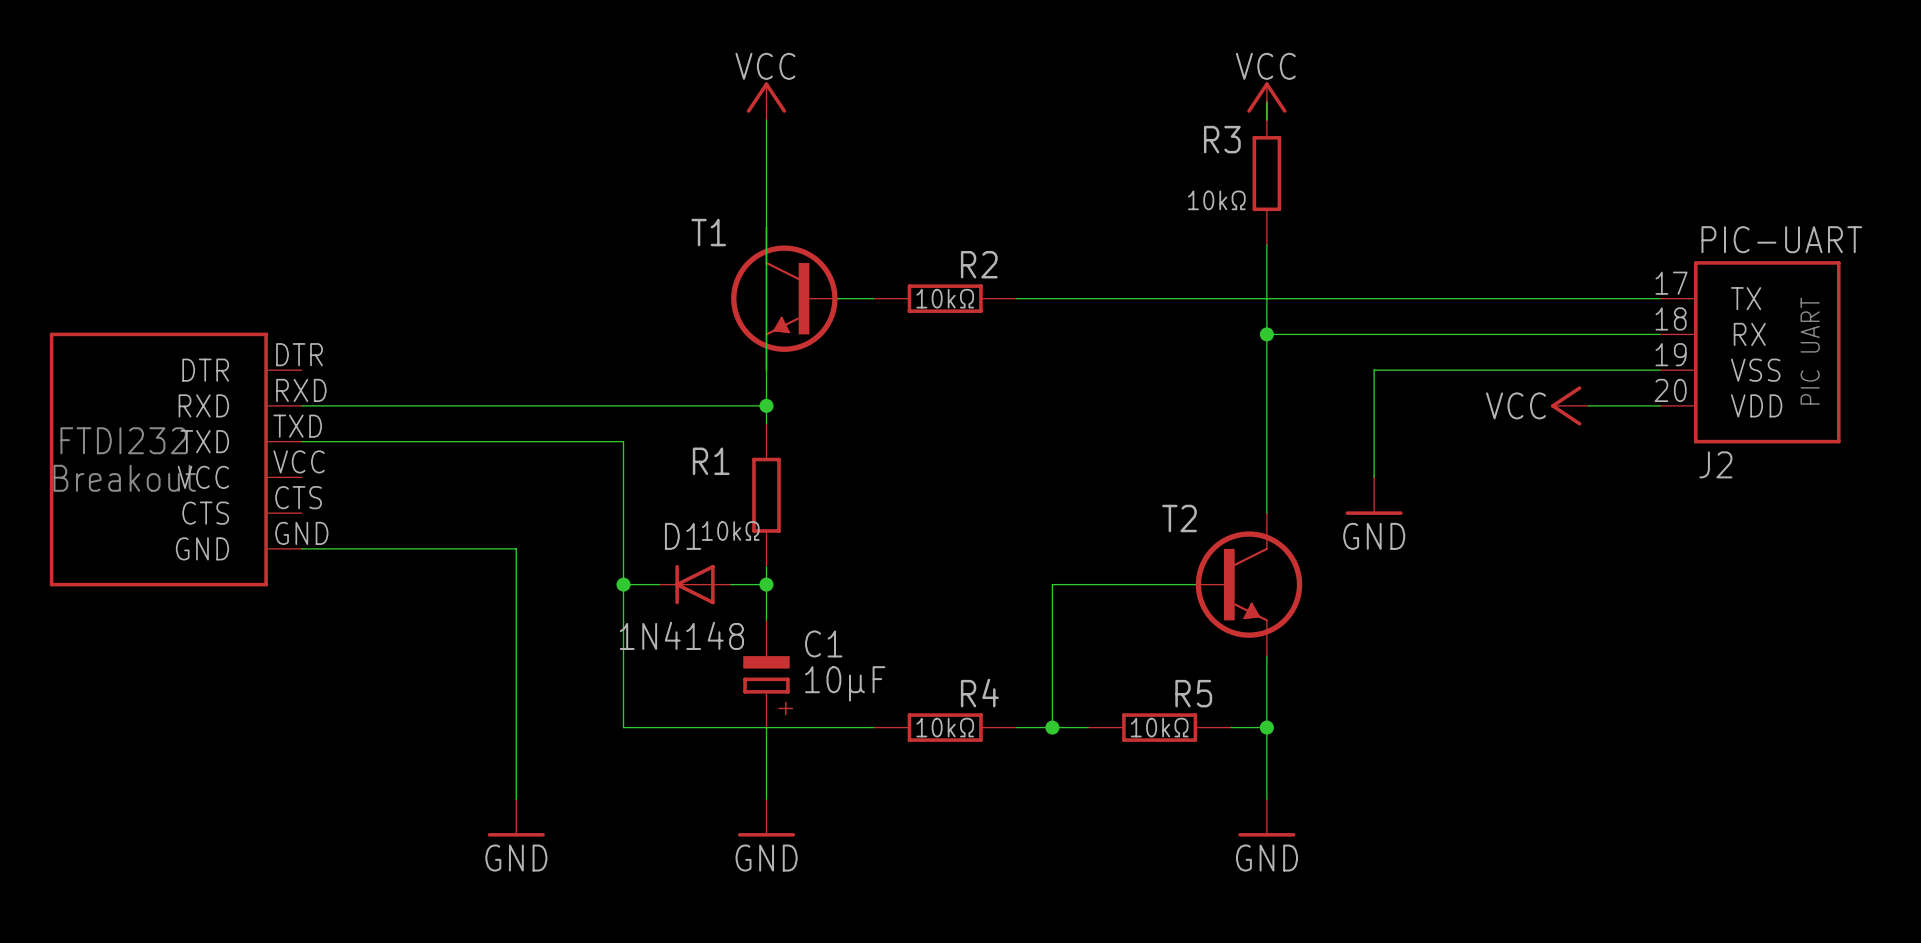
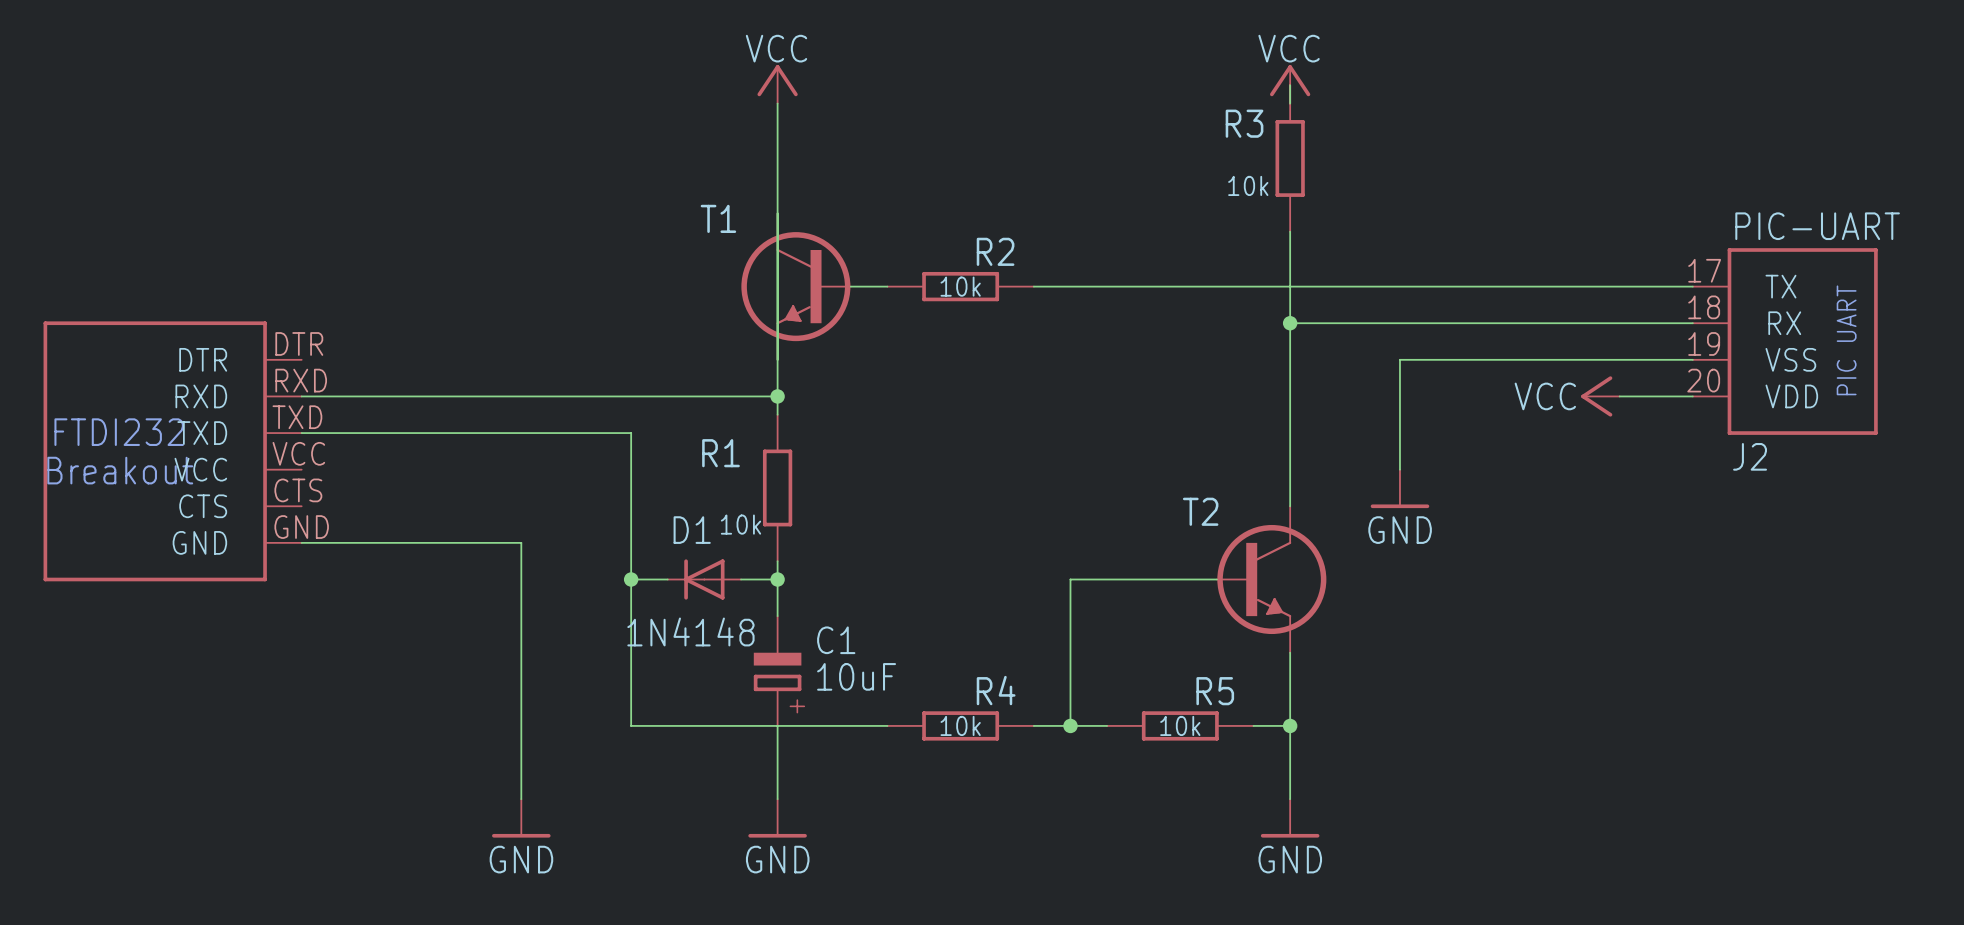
R3 value: 10kΩ (1216, 200) -> 10k (1248, 185)
R2 value: 10kΩ (945, 298) -> 10k (960, 286)
R1 value: 10kΩ (730, 531) -> 10k (740, 524)
C1 value: 10μF (845, 683) -> 10uF (856, 676)
R4 value: 10kΩ (945, 727) -> 10k (960, 725)
R5 value: 10kΩ (1159, 727) -> 10k (1180, 725)

